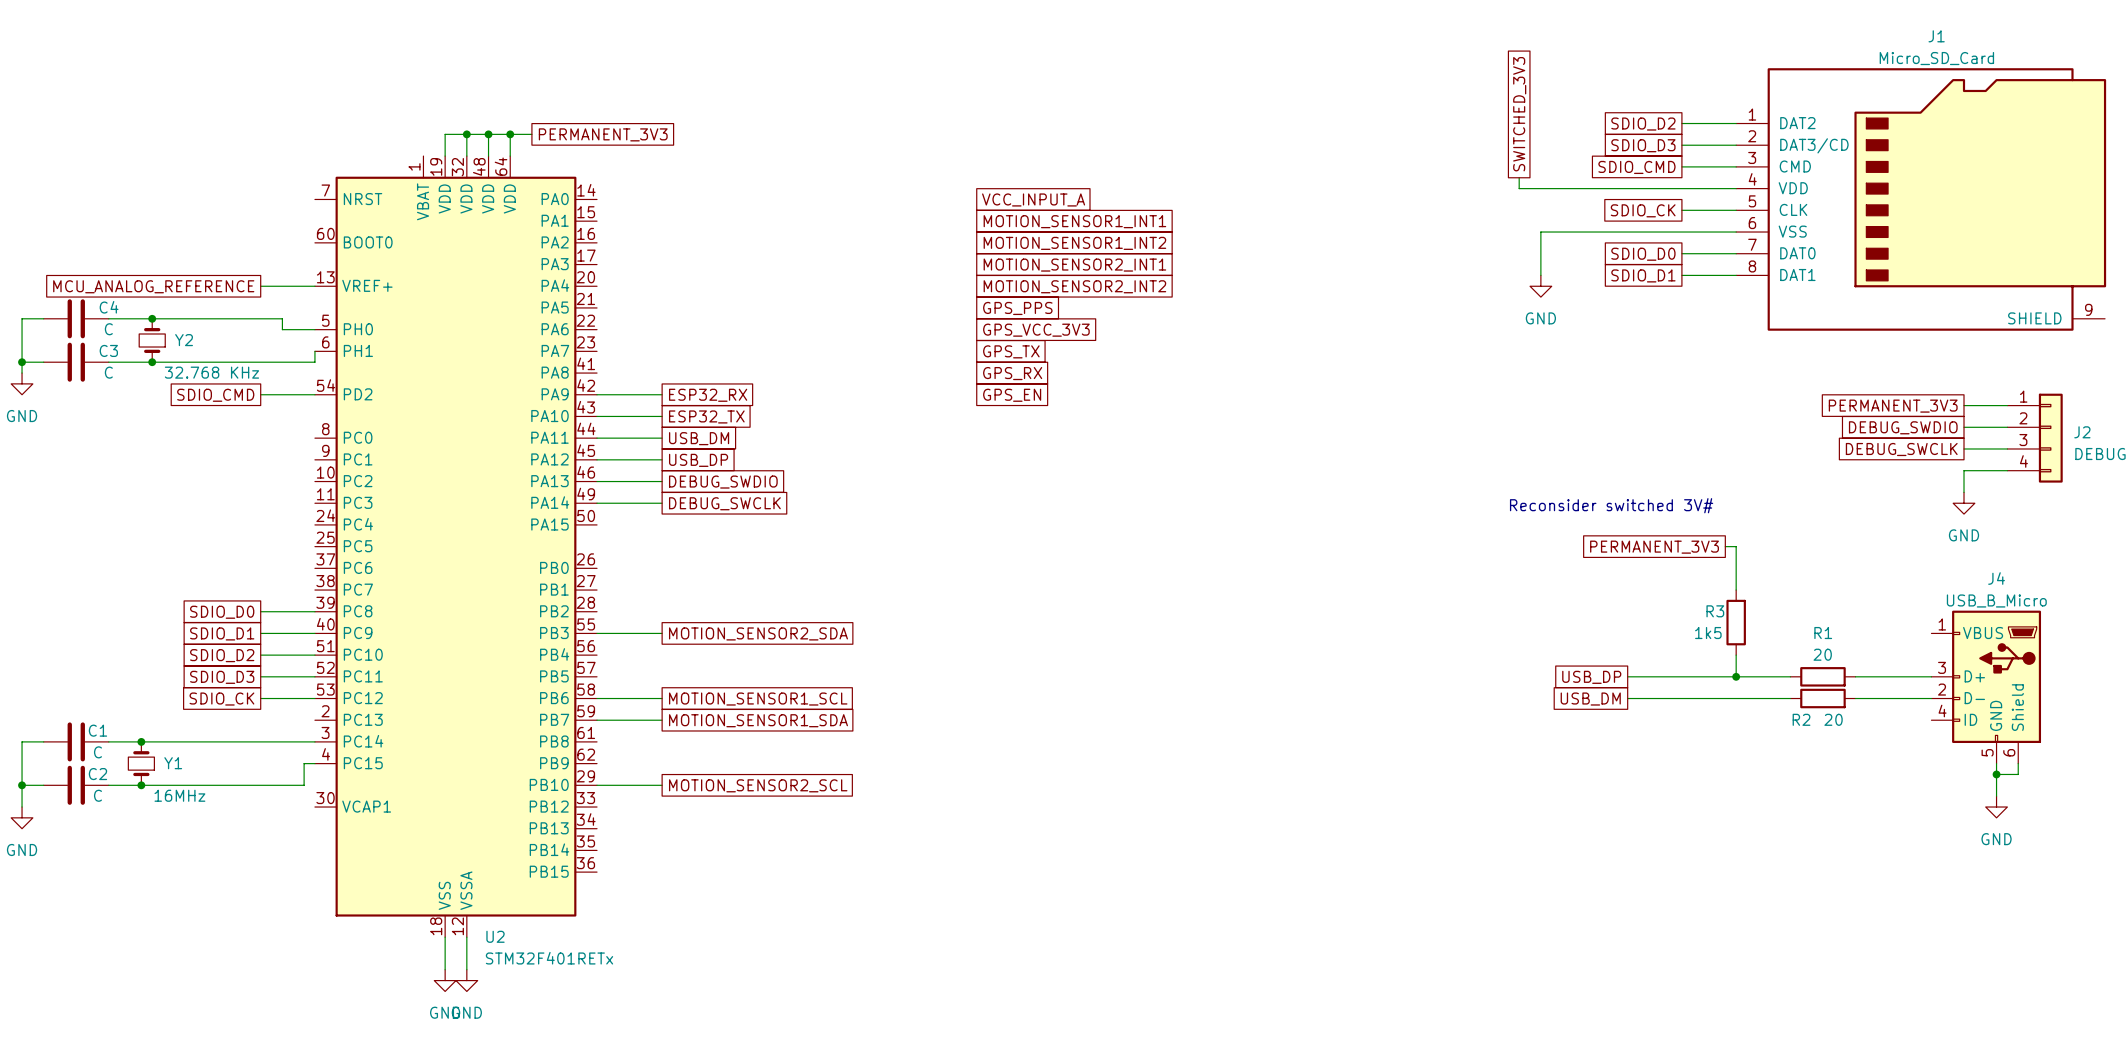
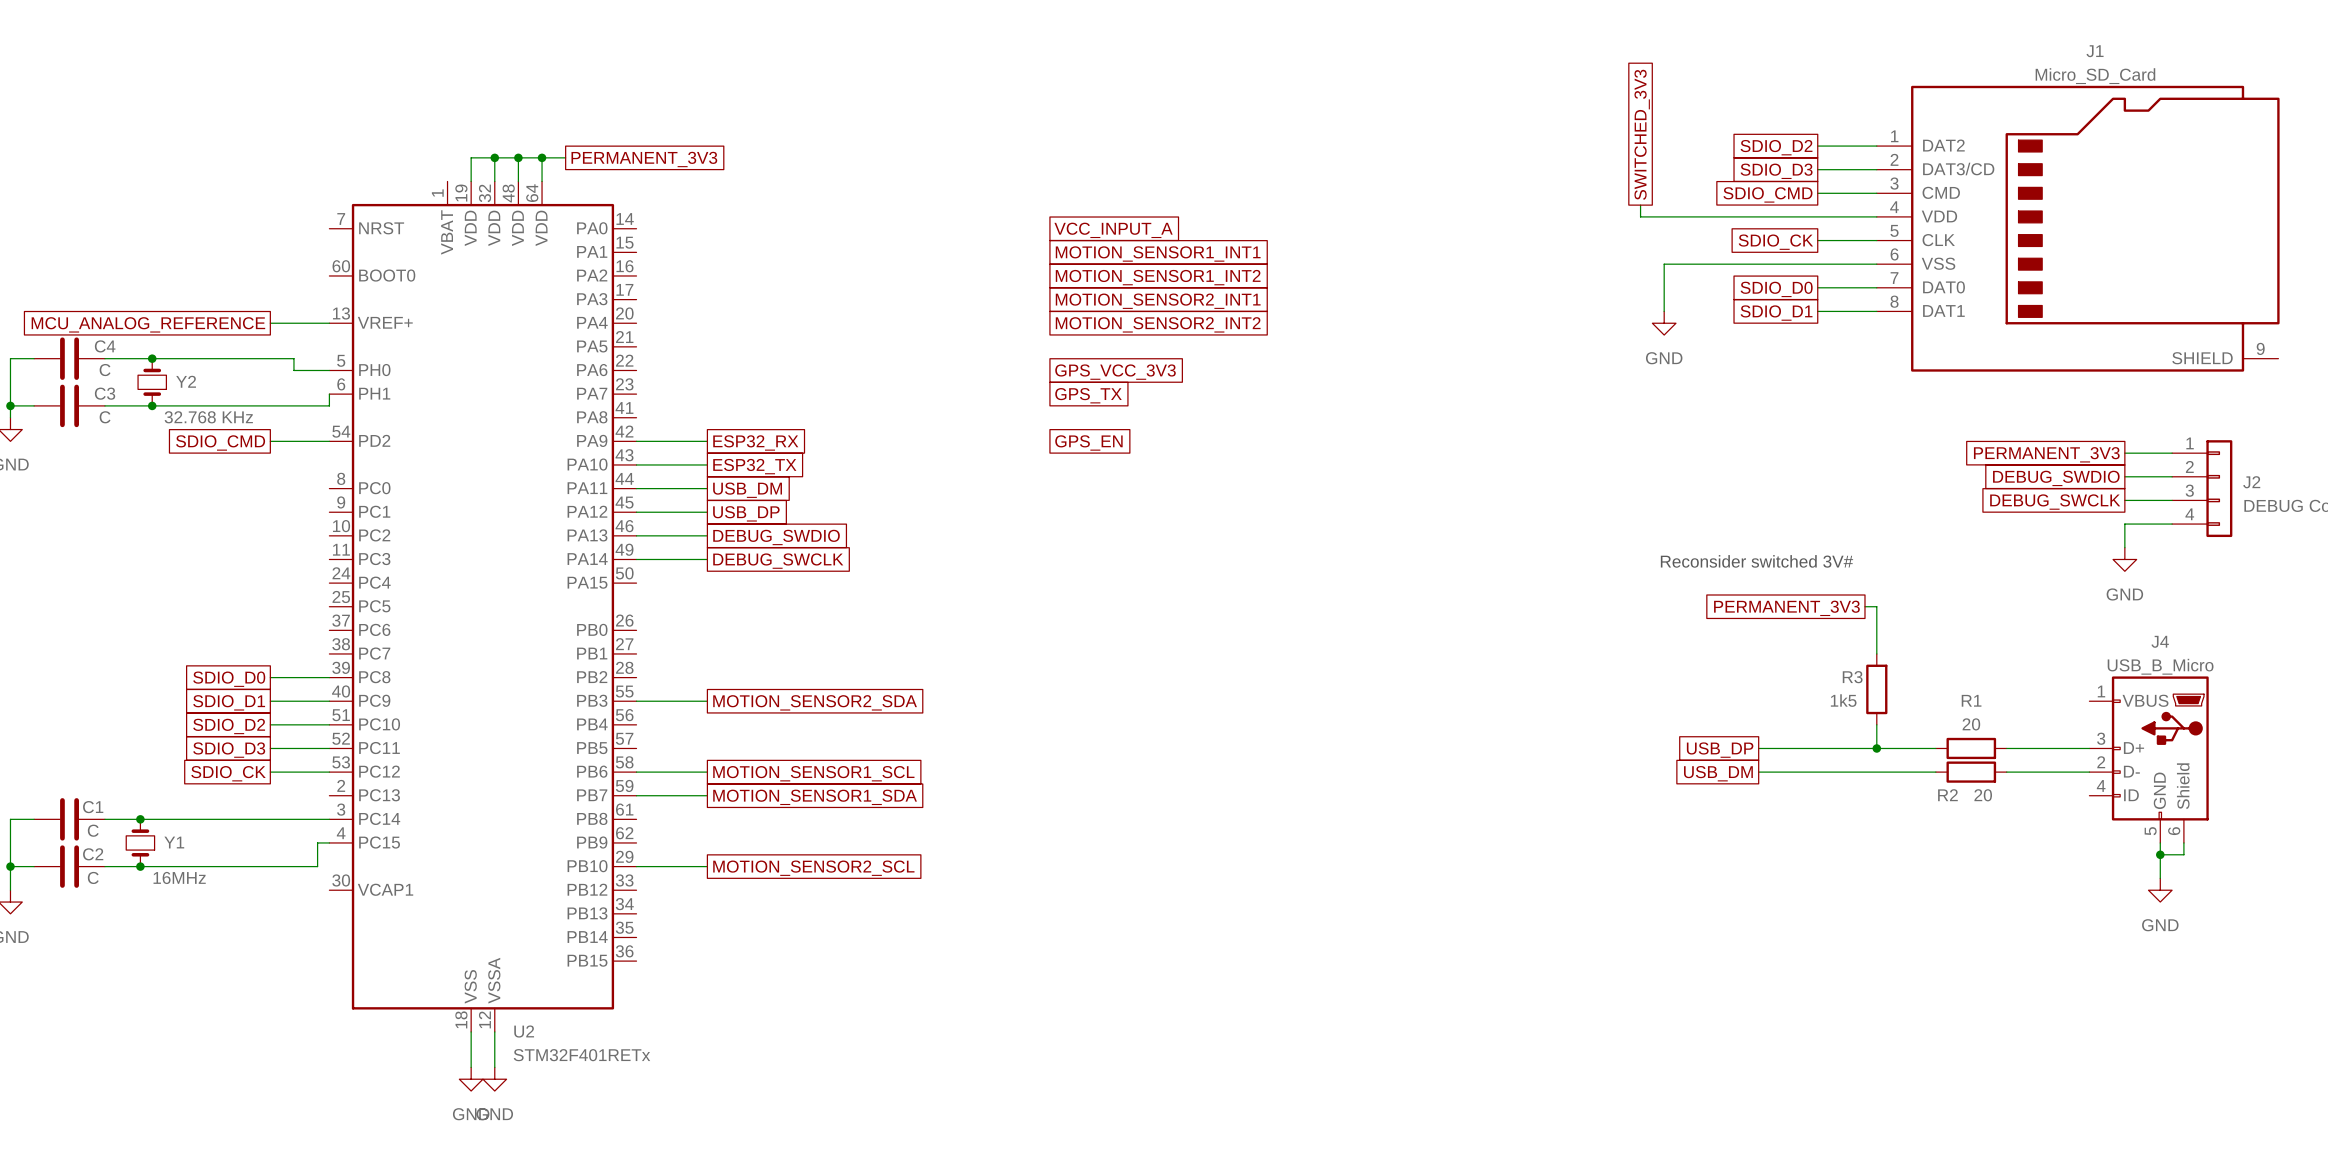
global label: GPS_PPS (1017, 308) -> none
global label: GPS_RX (1012, 373) -> none

